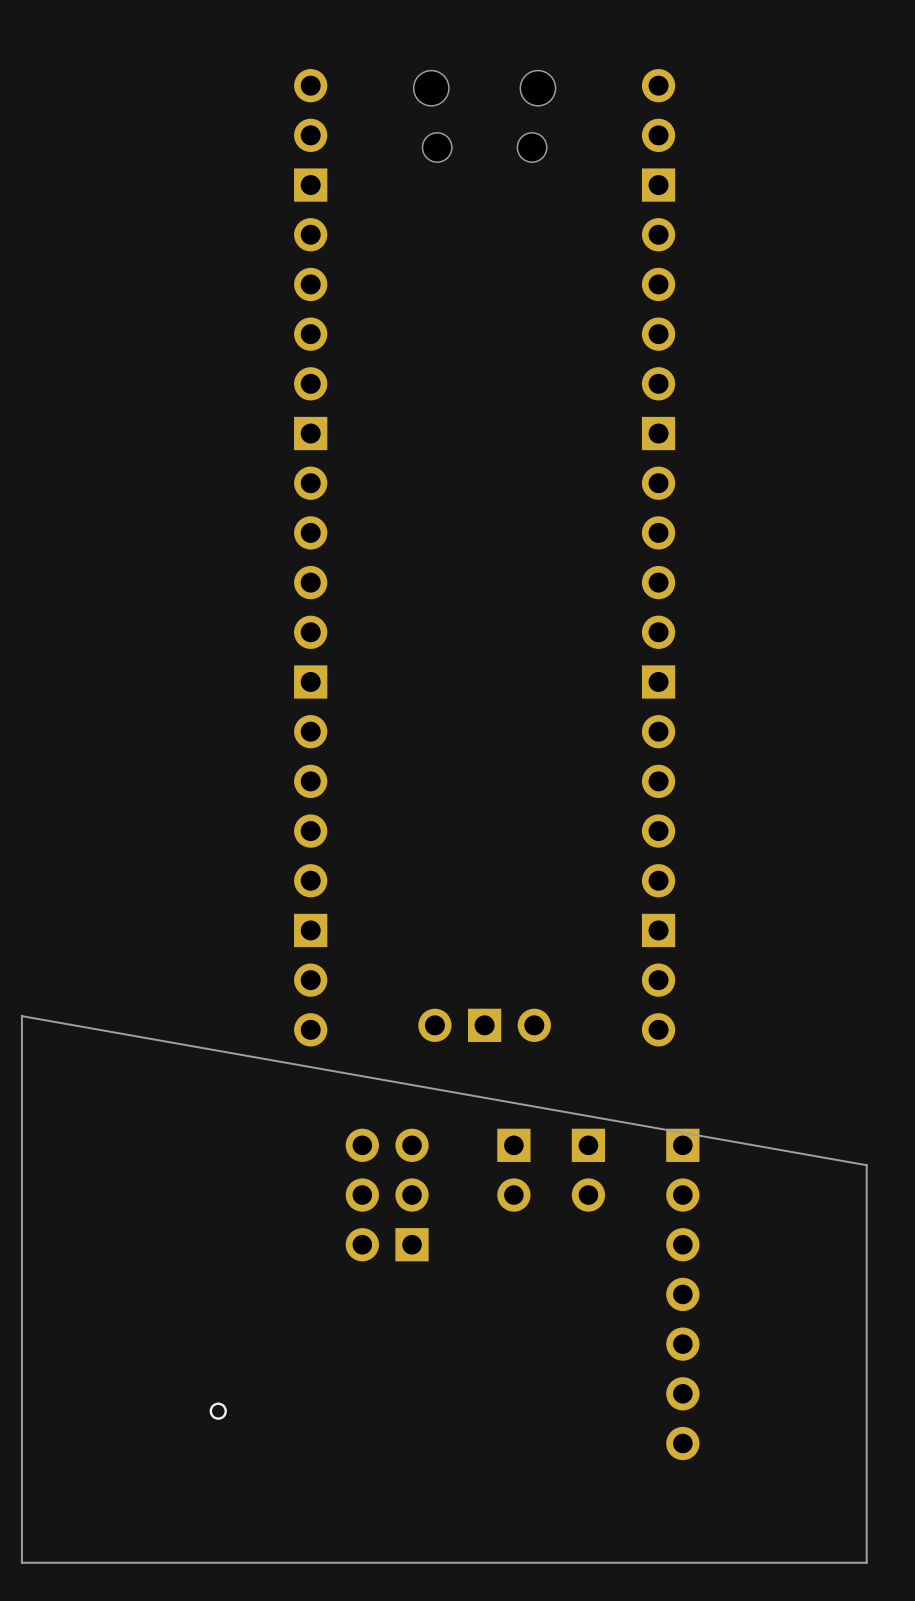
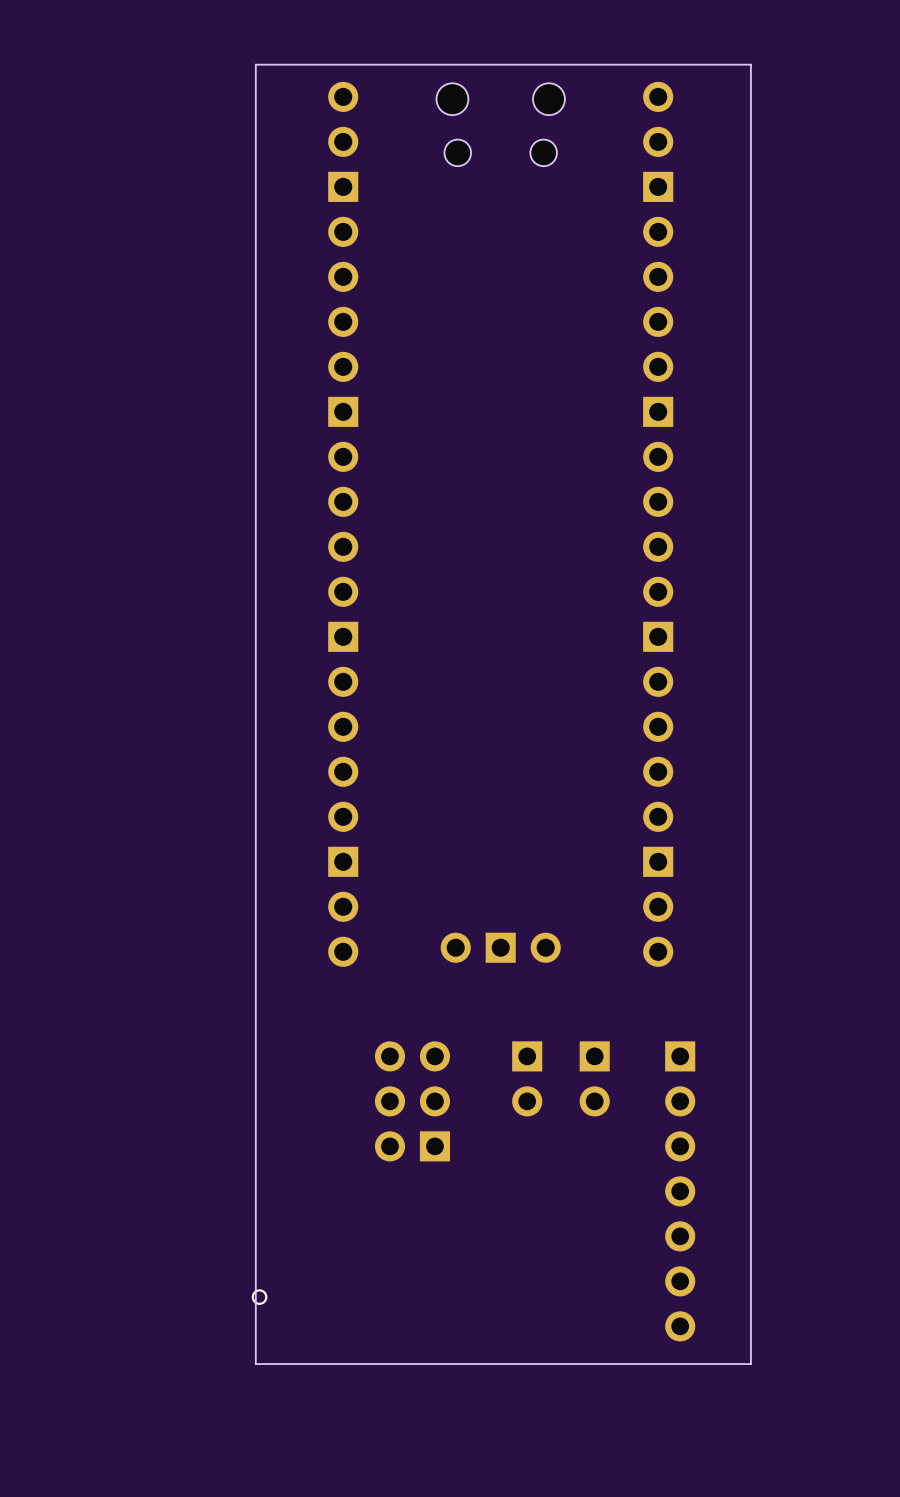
board edge: none -> (750, 64) (255, 64) (255, 1364) (750, 1364) (750, 64)
board edge: (21, 1016) (866, 1165) (866, 1562) (21, 1562) (21, 1016) -> none

